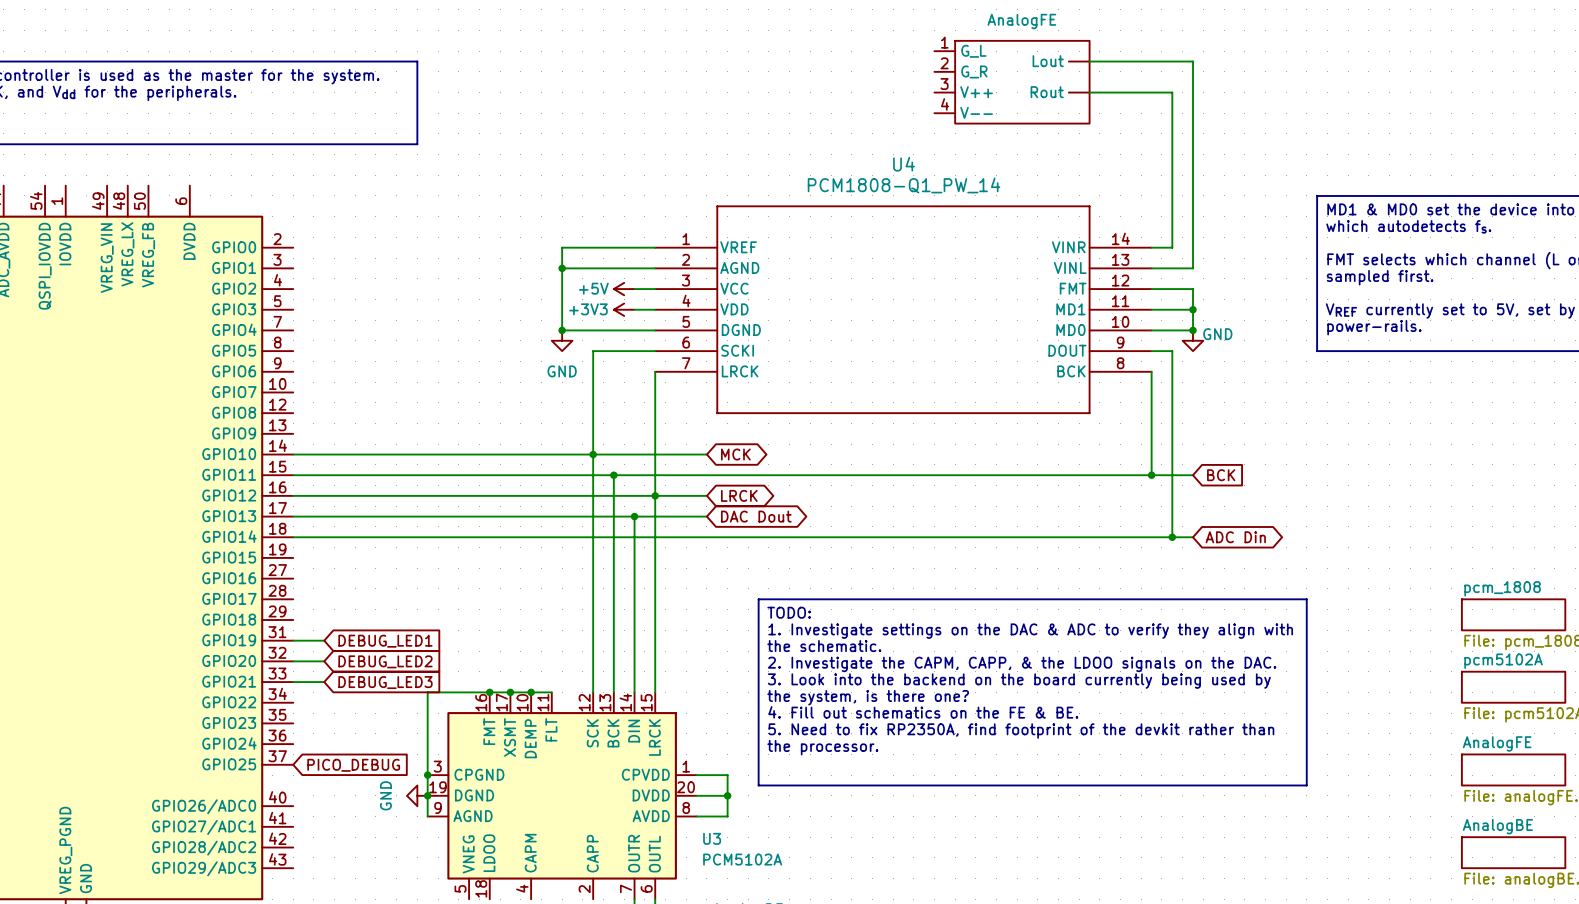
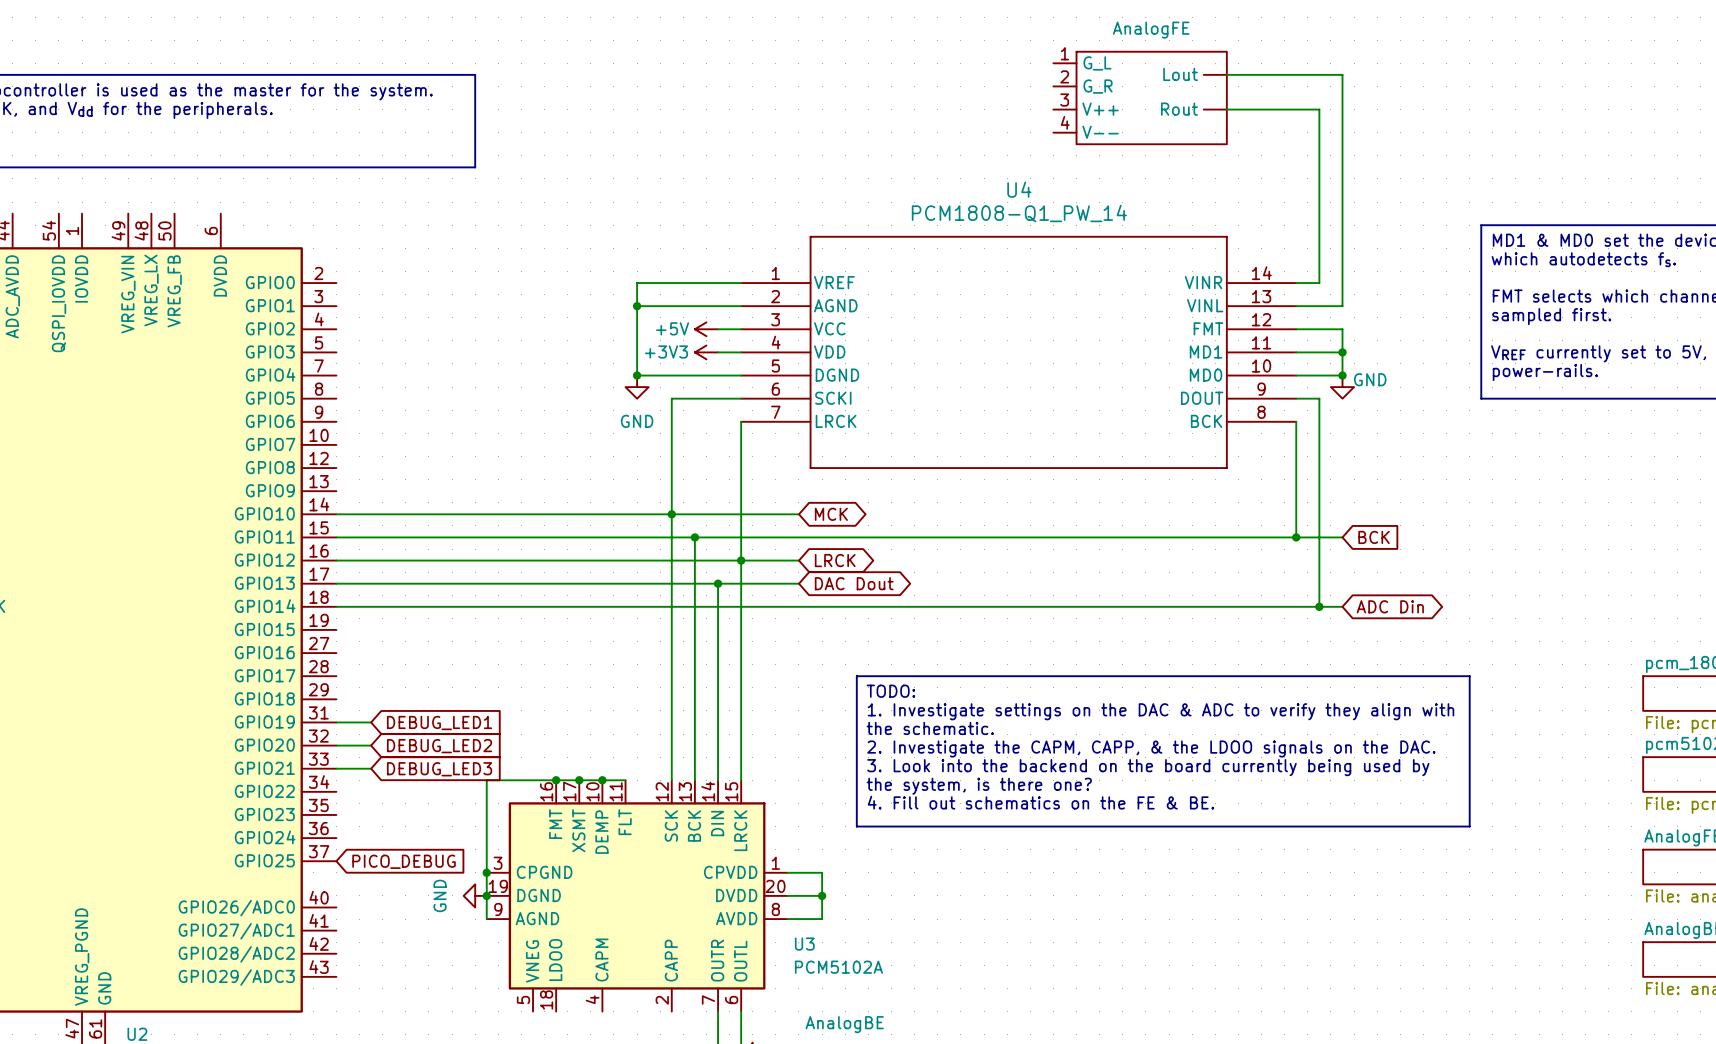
text: 5. Need to fix RP2350A, find footprint of the devkit rather than (1021, 731) -> none
line: (758, 733) (758, 785) (1306, 785) (1306, 733) -> (856, 826) (1469, 826)
text: the processor. (822, 747) -> none

